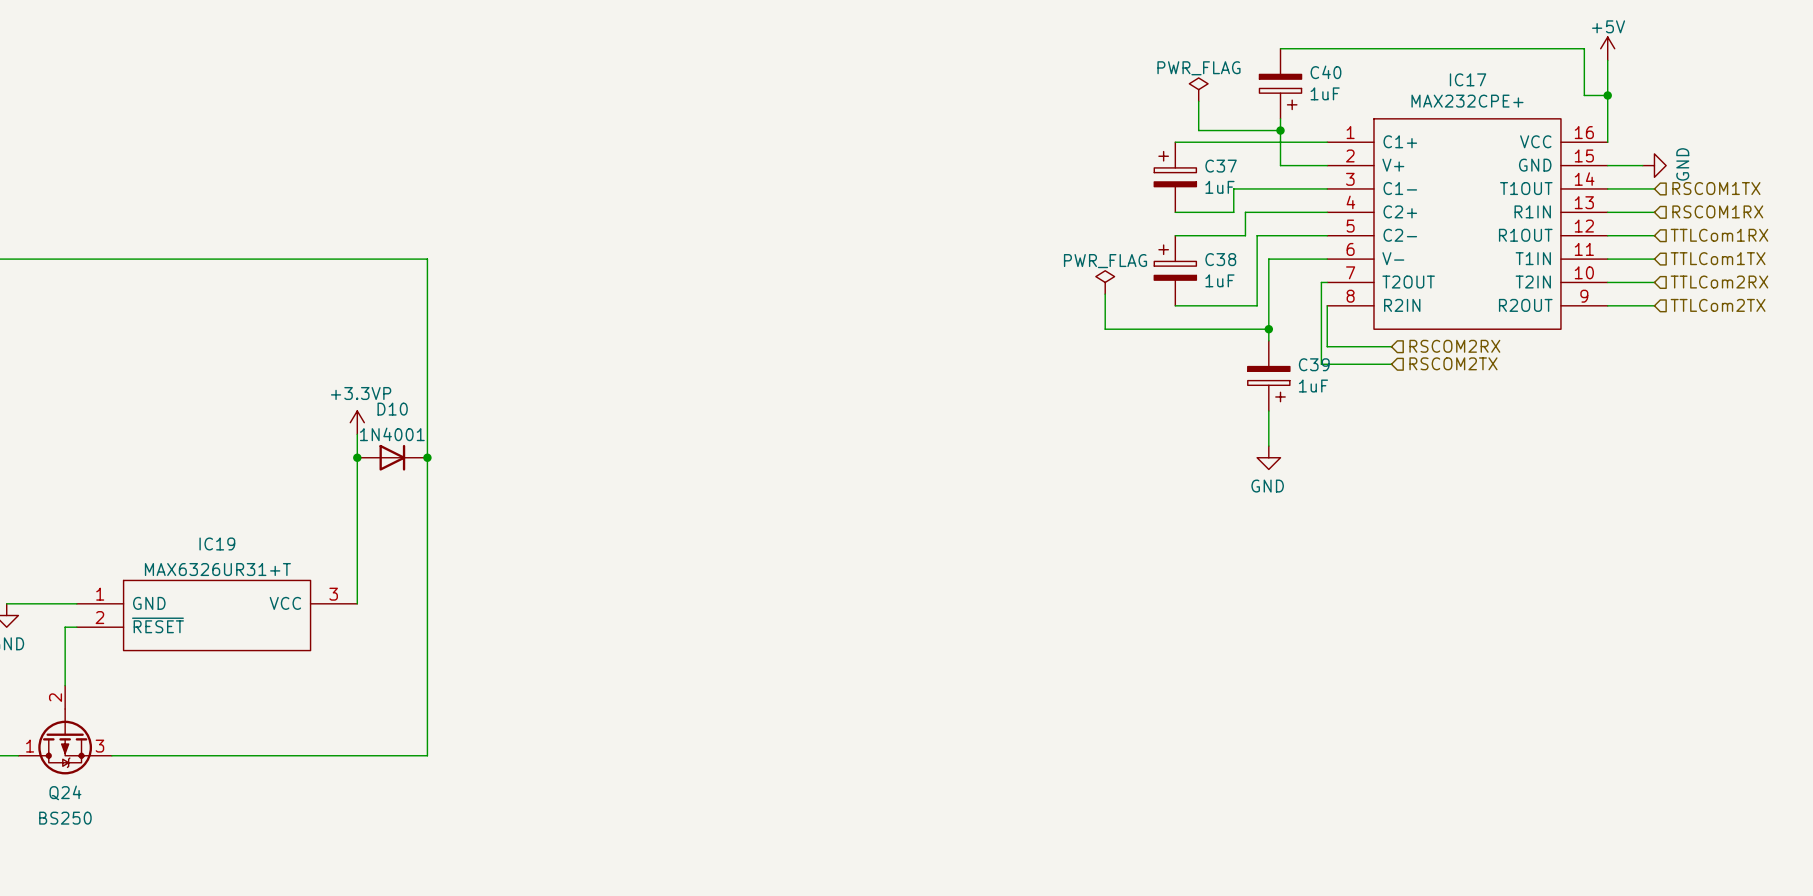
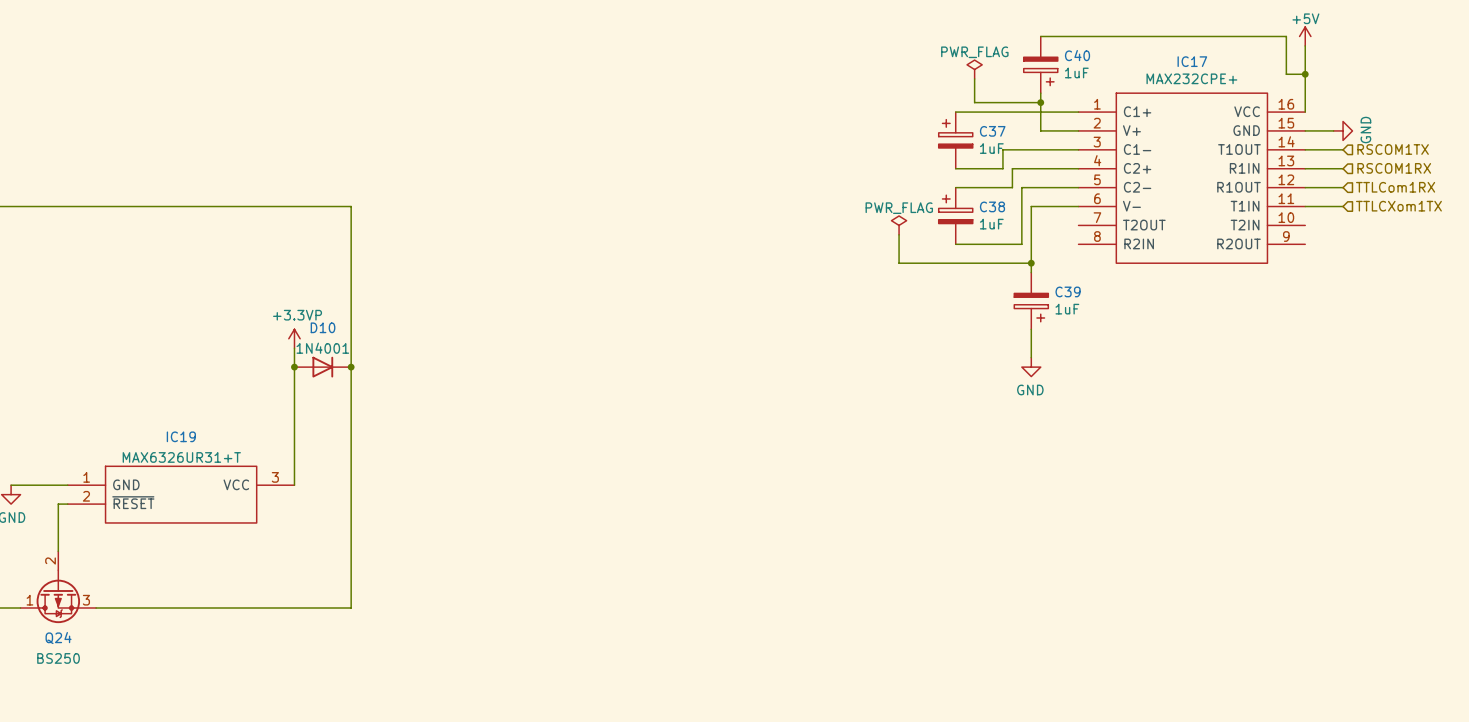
hierarchical label: TTLCom1TX (1718, 258) -> TTLCXom1TX (1398, 206)
wire: (1327, 282) (1321, 282) (1321, 364) (1391, 364) -> none
wire: (1607, 282) (1654, 282) -> none
hierarchical label: TTLCom2RX (1719, 282) -> none
wire: (1327, 305) (1327, 346) (1391, 346) -> none
wire: (1607, 305) (1654, 305) -> none
hierarchical label: TTLCom2TX (1718, 305) -> none
hierarchical label: RSCOM2RX (1454, 346) -> none
hierarchical label: RSCOM2TX (1453, 363) -> none

